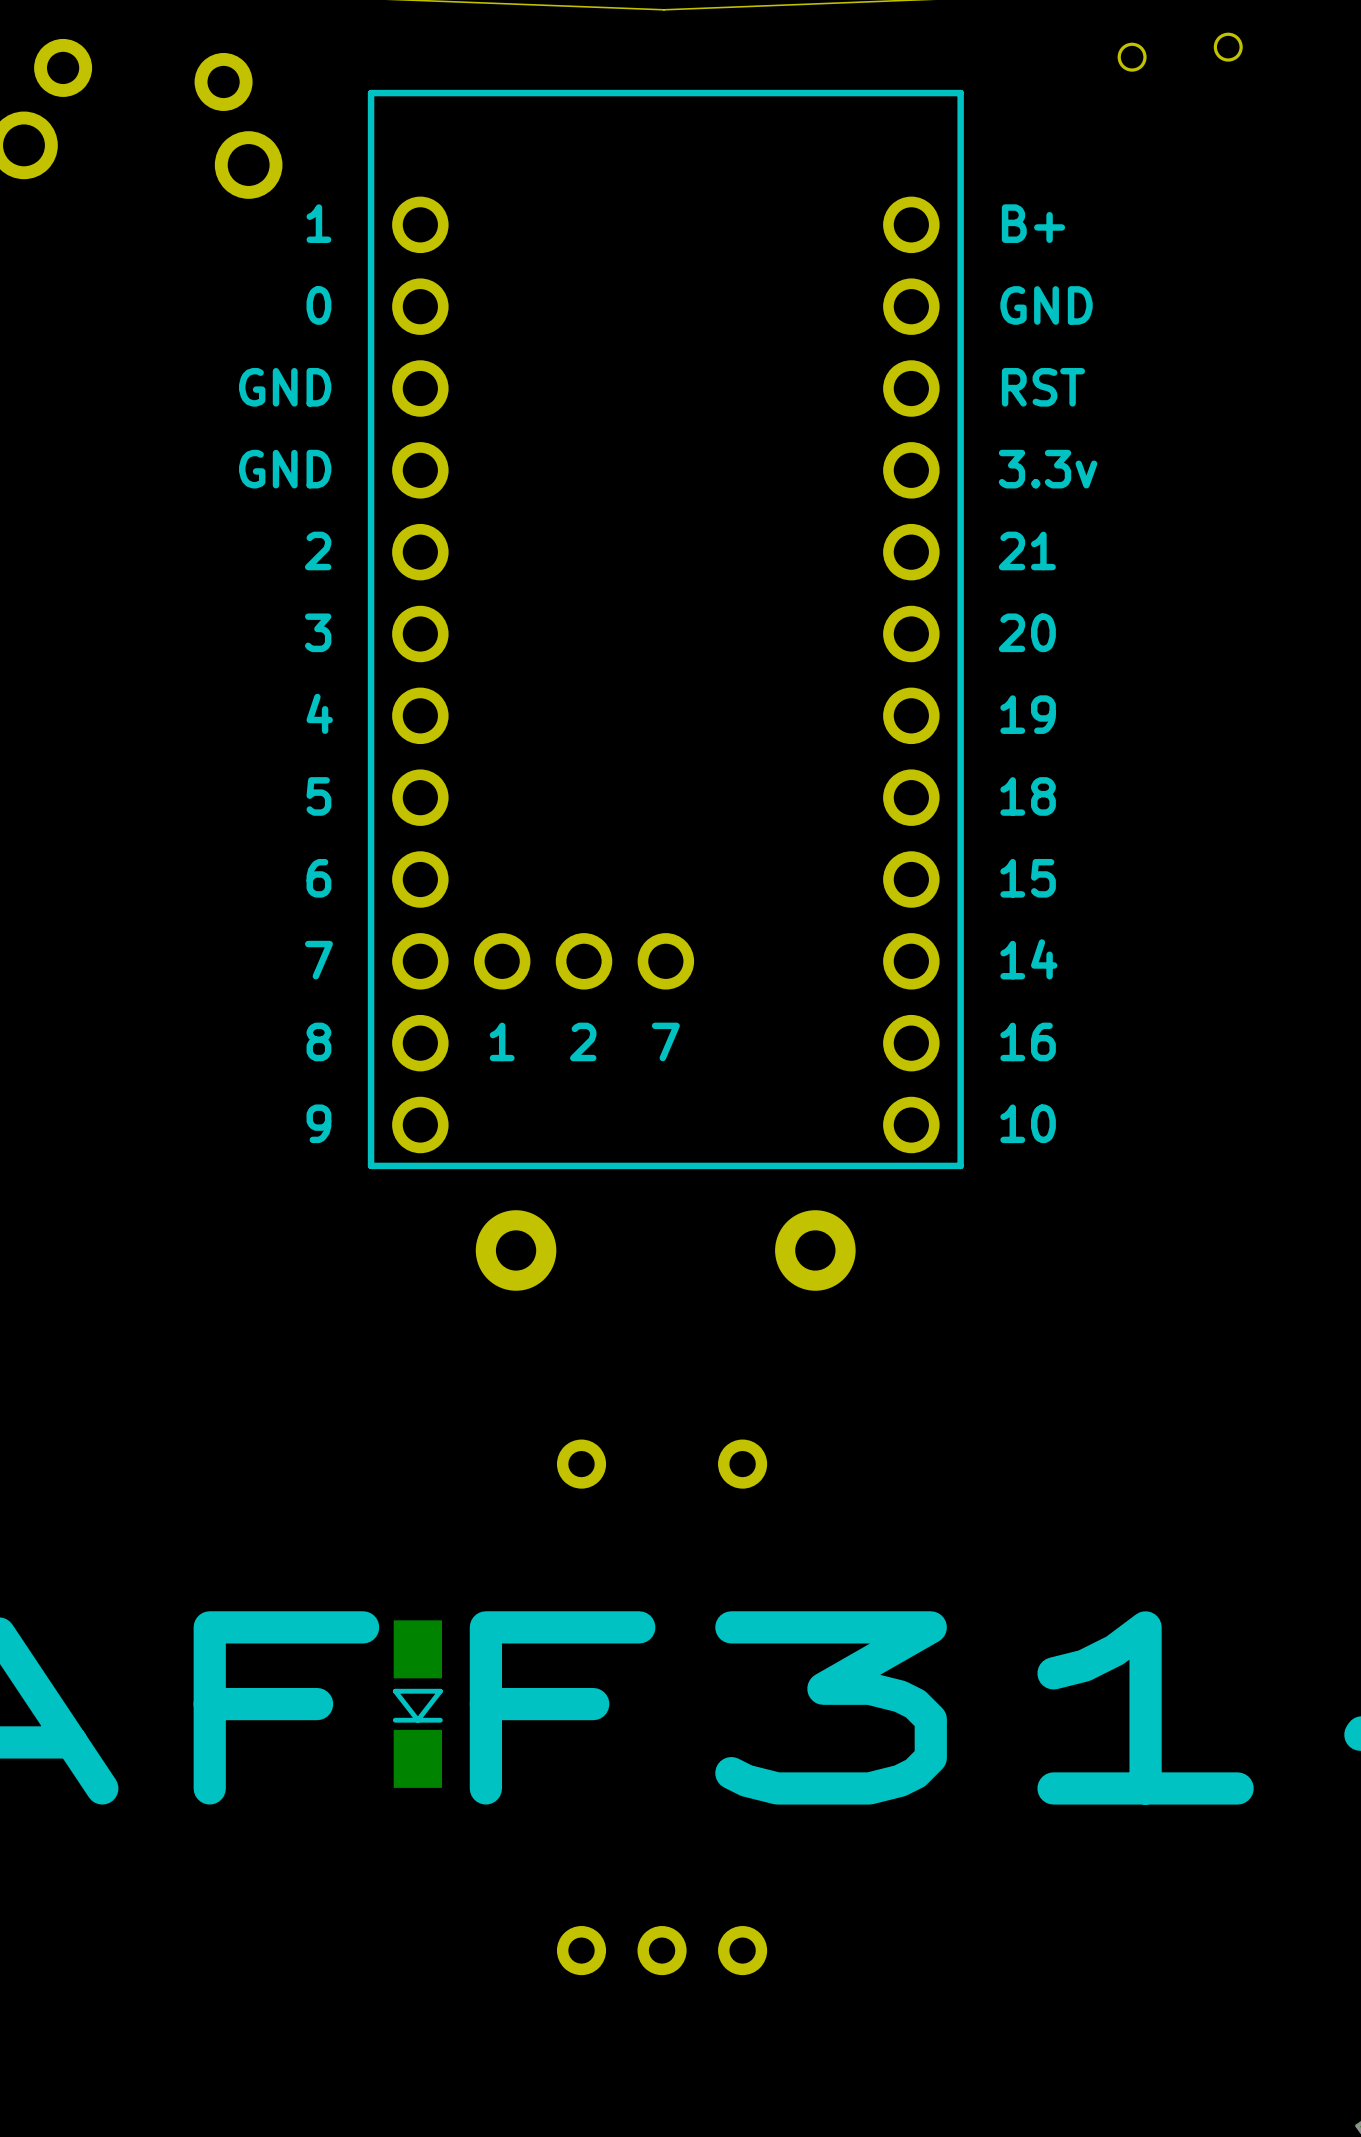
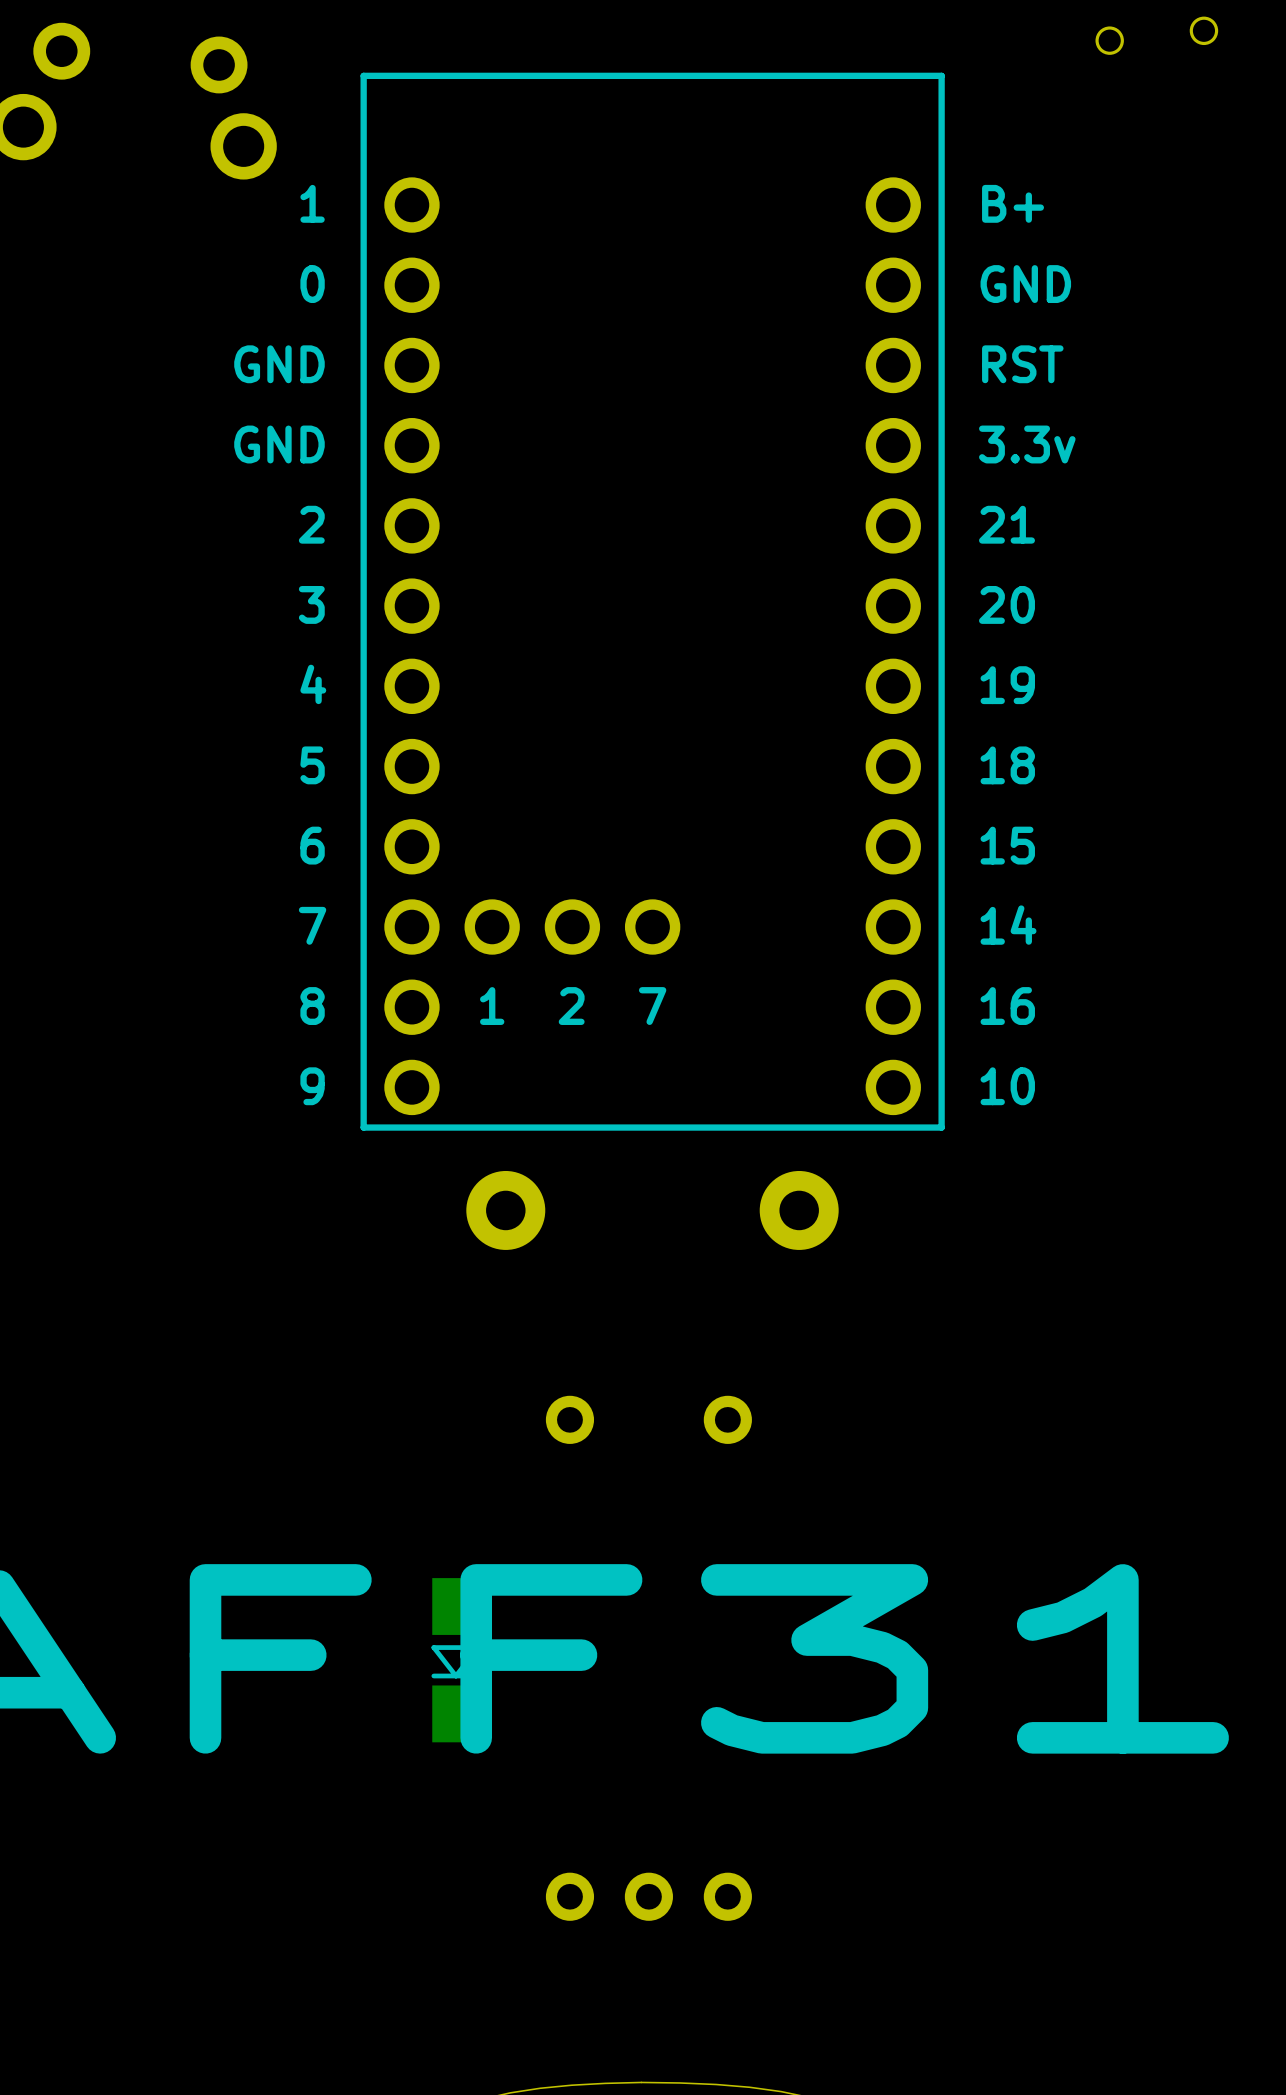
part position: (417, 1704) -> (455, 1660)

